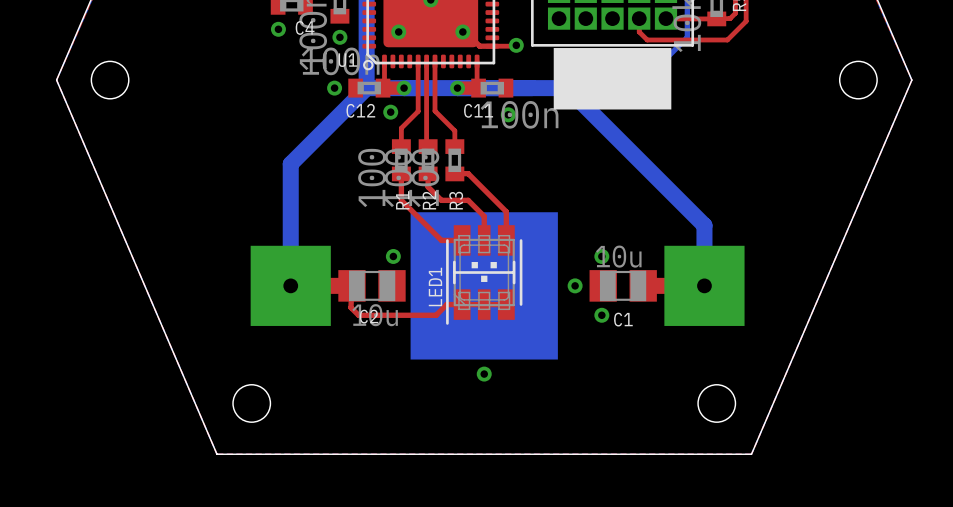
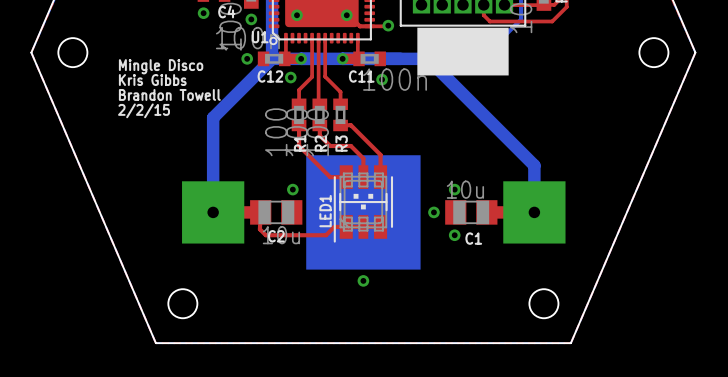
text: none -> Mingle Disco (161, 66)
text: none -> Kris Gibbs (152, 80)
text: none -> Brandon Towell (169, 94)
text: none -> 2/2/15 (144, 110)

